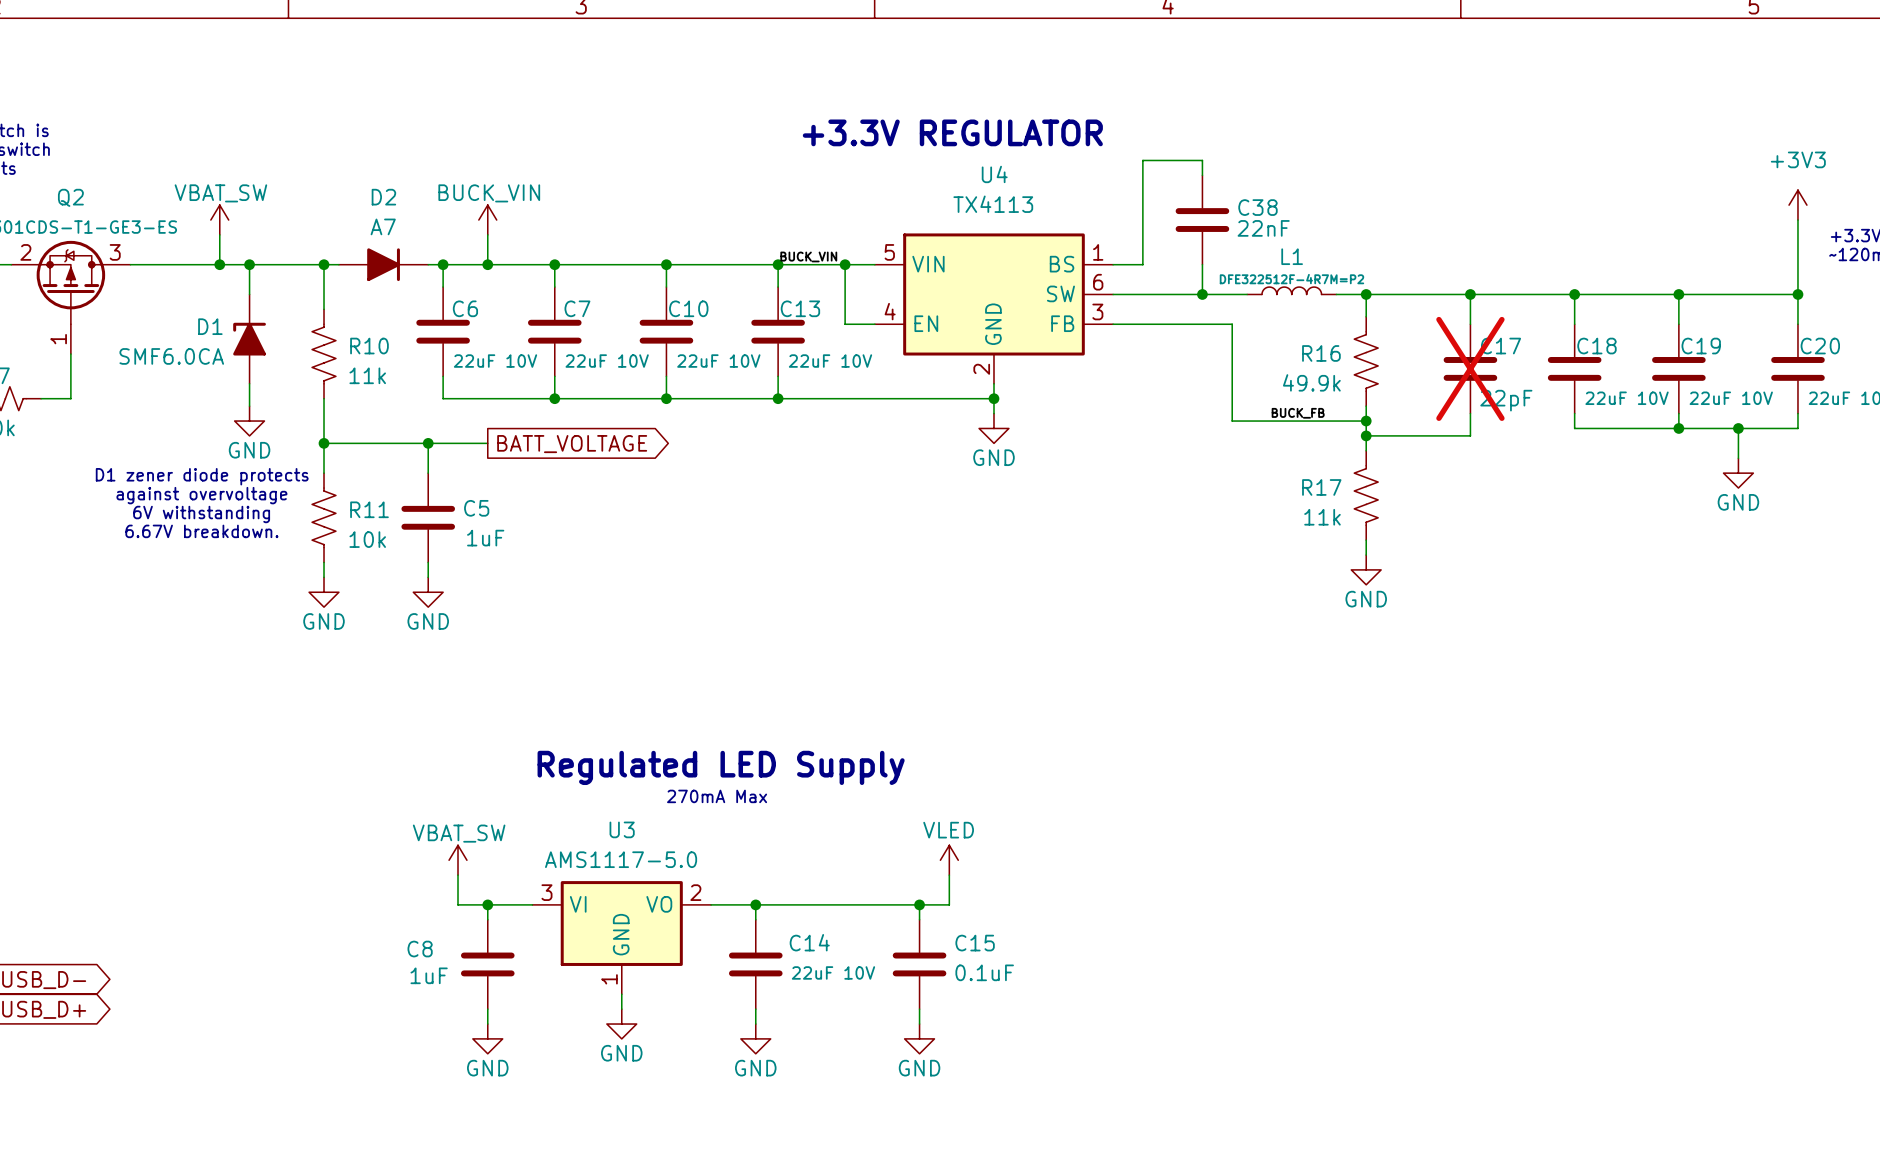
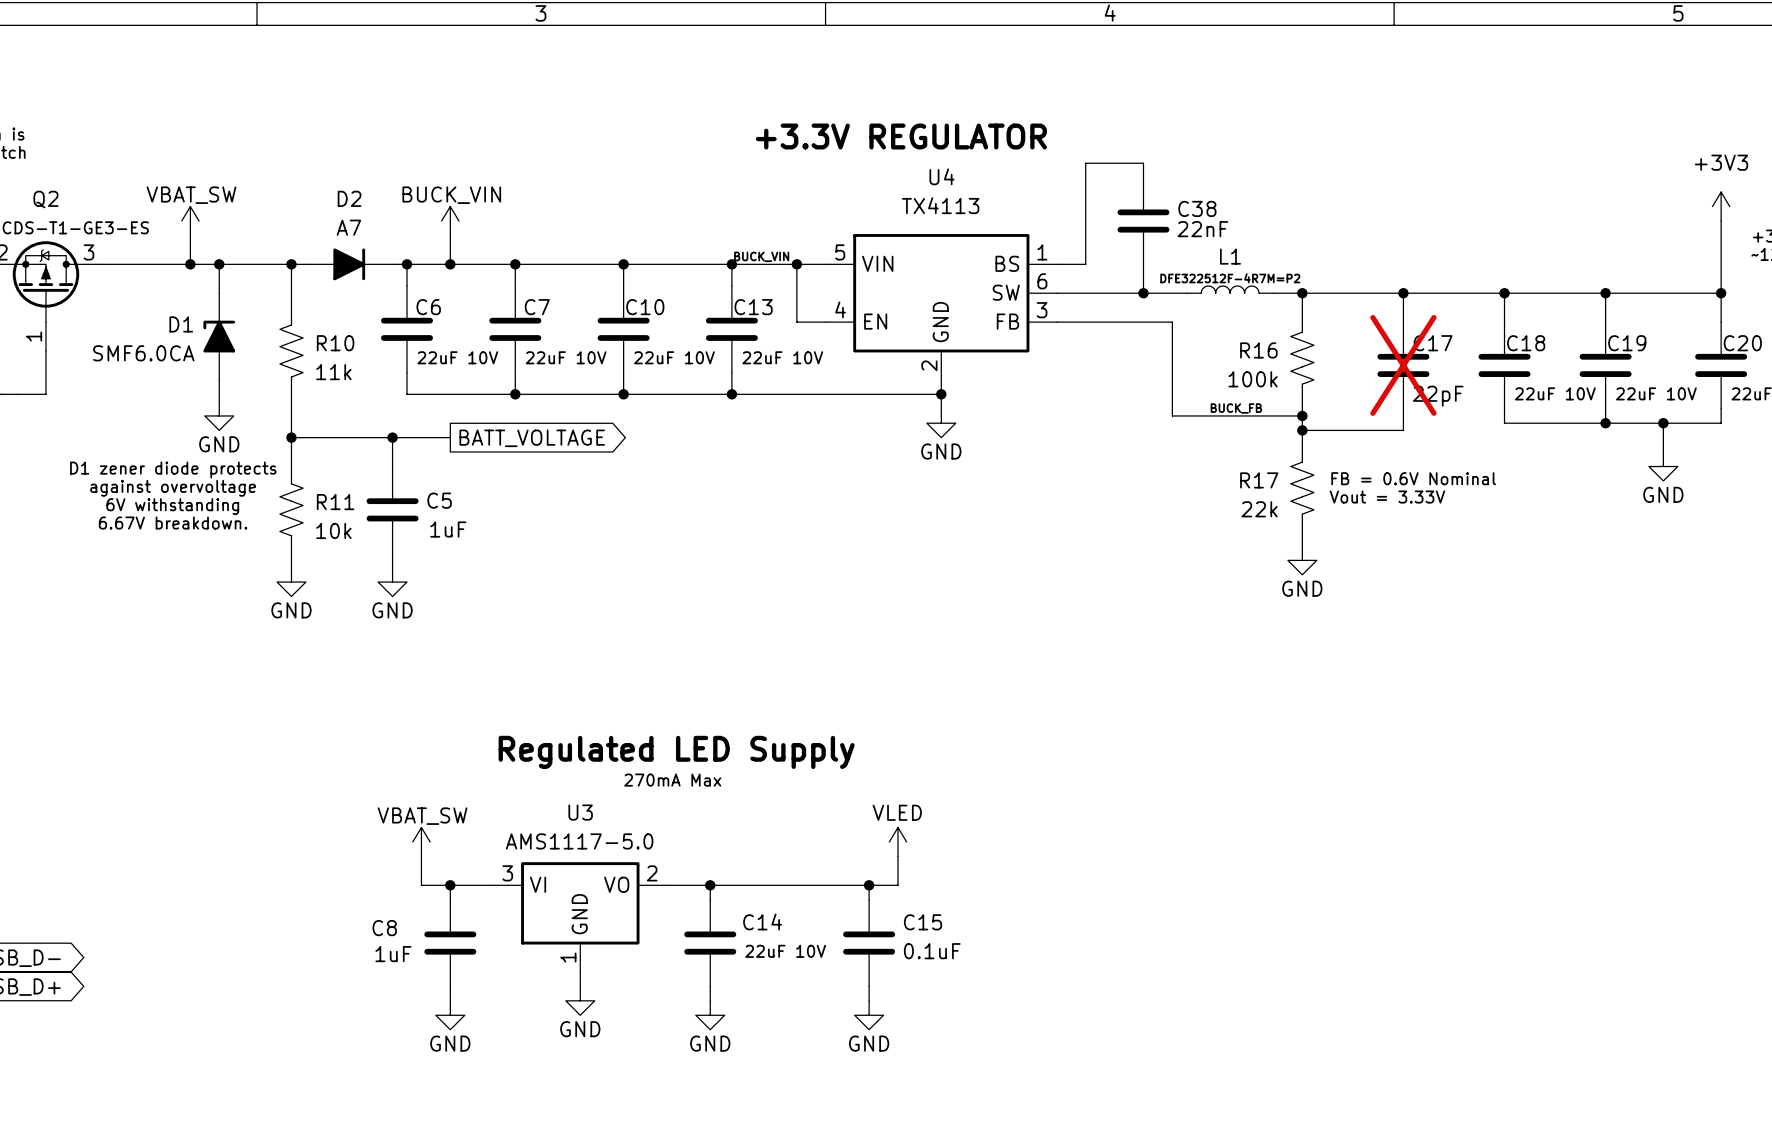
R16 value: 49.9k (1311, 382) -> 100k (1253, 379)
text: none -> FB = 0.6V Nominal (1413, 478)
text: none -> Vout = 3.33V (1387, 497)
R17 value: 11k (1322, 517) -> 22k (1259, 509)

